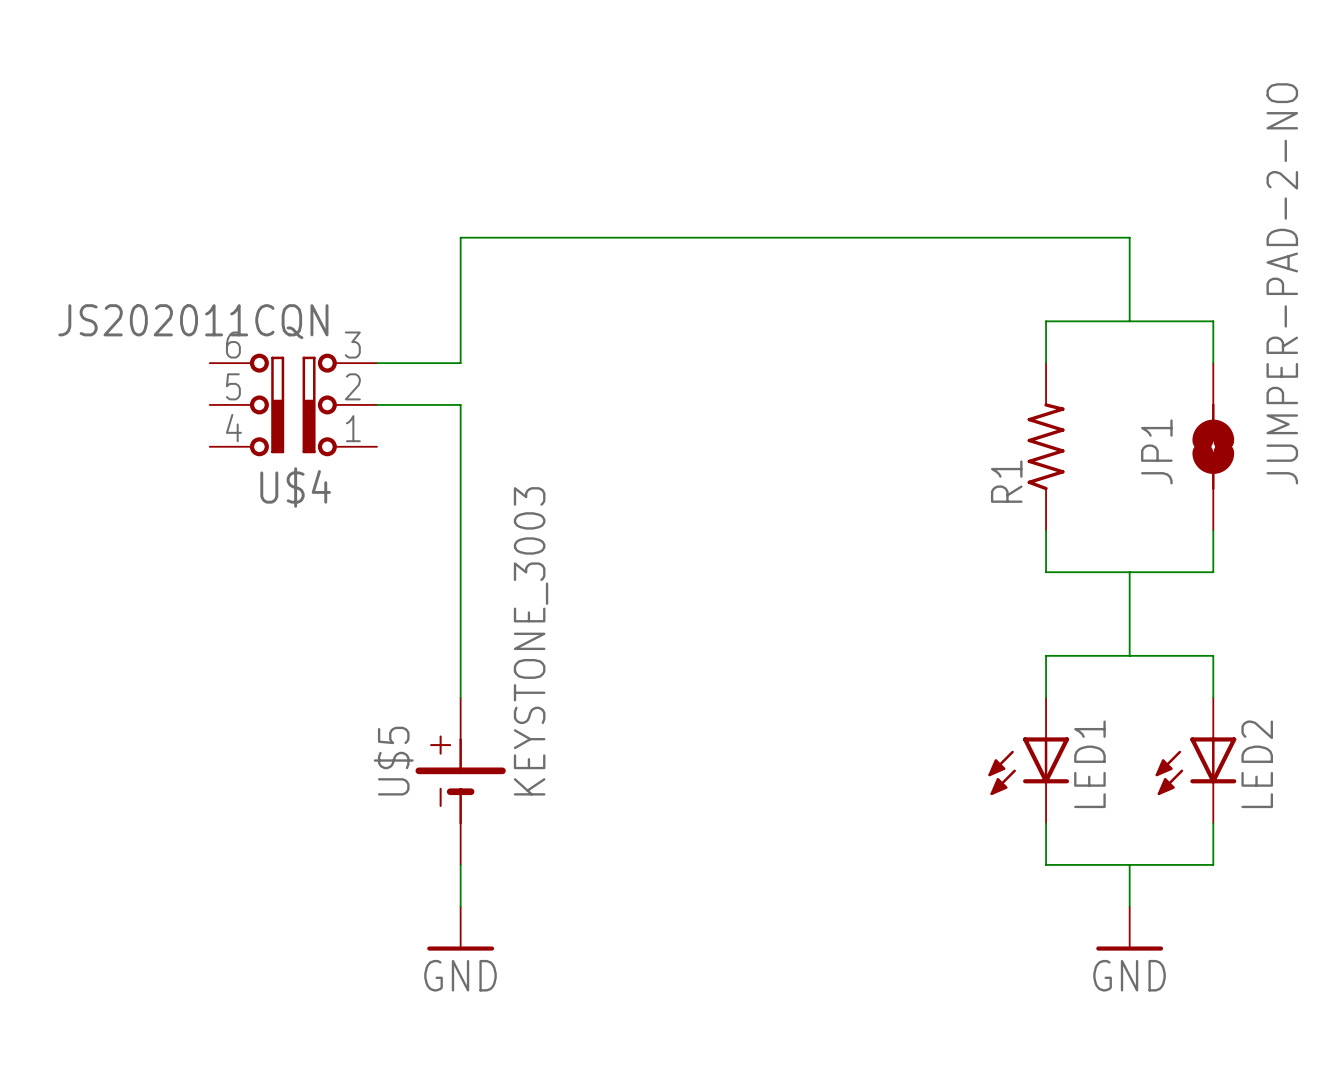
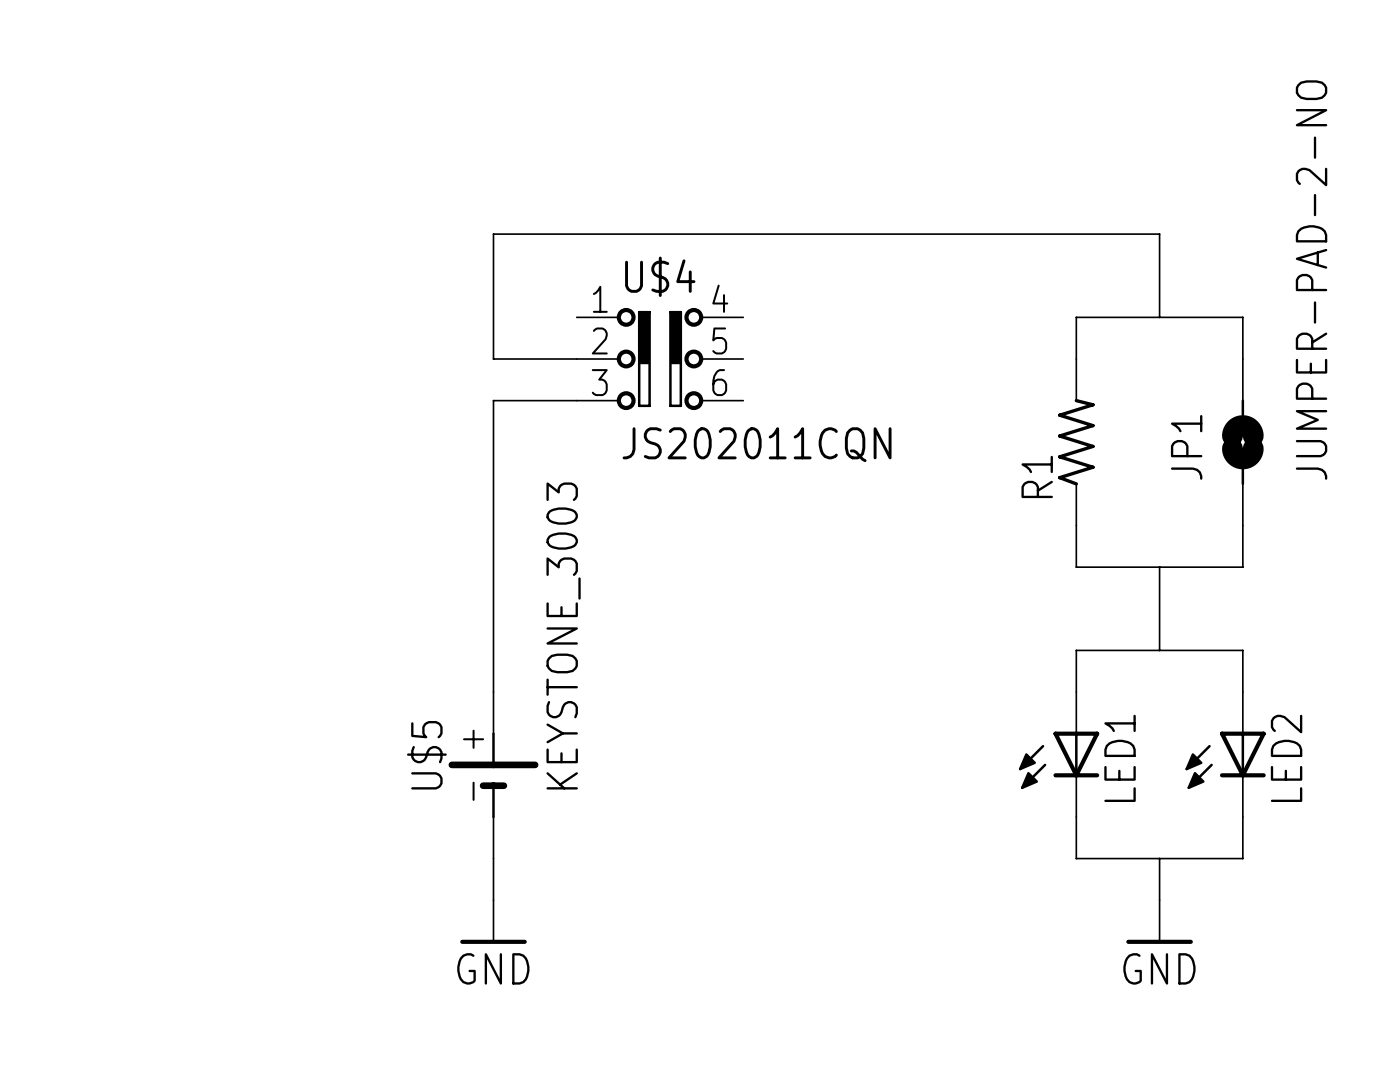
wire: (377, 363) (460, 363) -> (576, 359) (493, 359)
U$4 rotation: 0° (293, 404) -> 180° (660, 359)
U$4 position: (293, 404) -> (660, 359)
wire: (377, 404) (460, 404) -> (576, 400) (493, 400)

